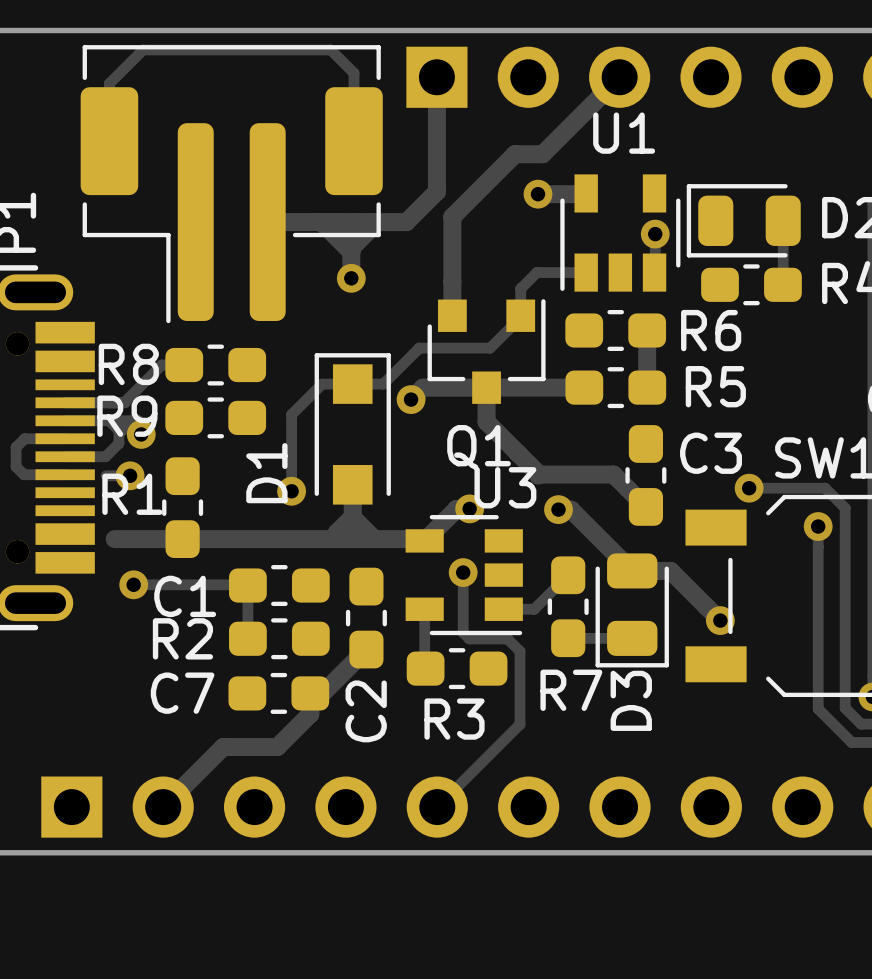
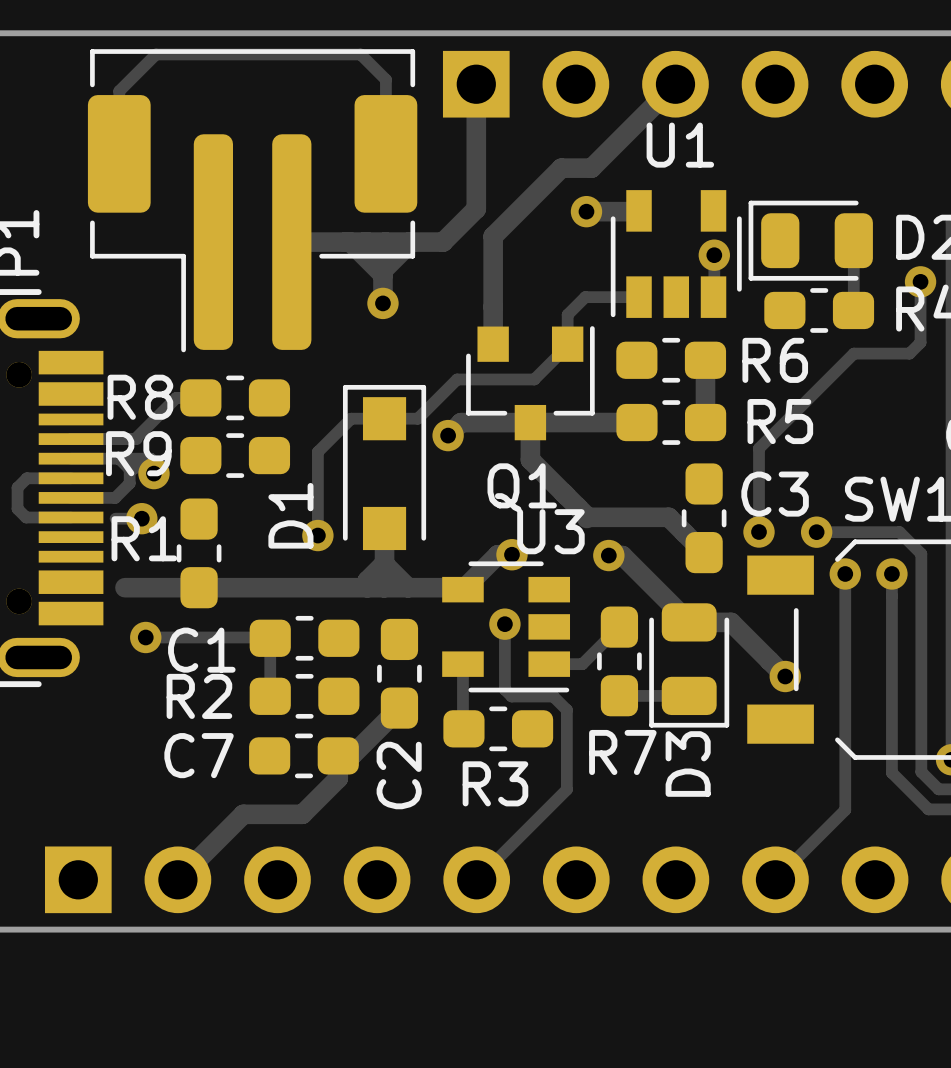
track: none -> (920, 281) (920, 342) (909, 353) (853, 353) (759, 448) (759, 532)
via: none -> (920, 281)
via: none -> (759, 532)
track: none -> (845, 573) (845, 810) (775, 879)
via: none -> (845, 573)

